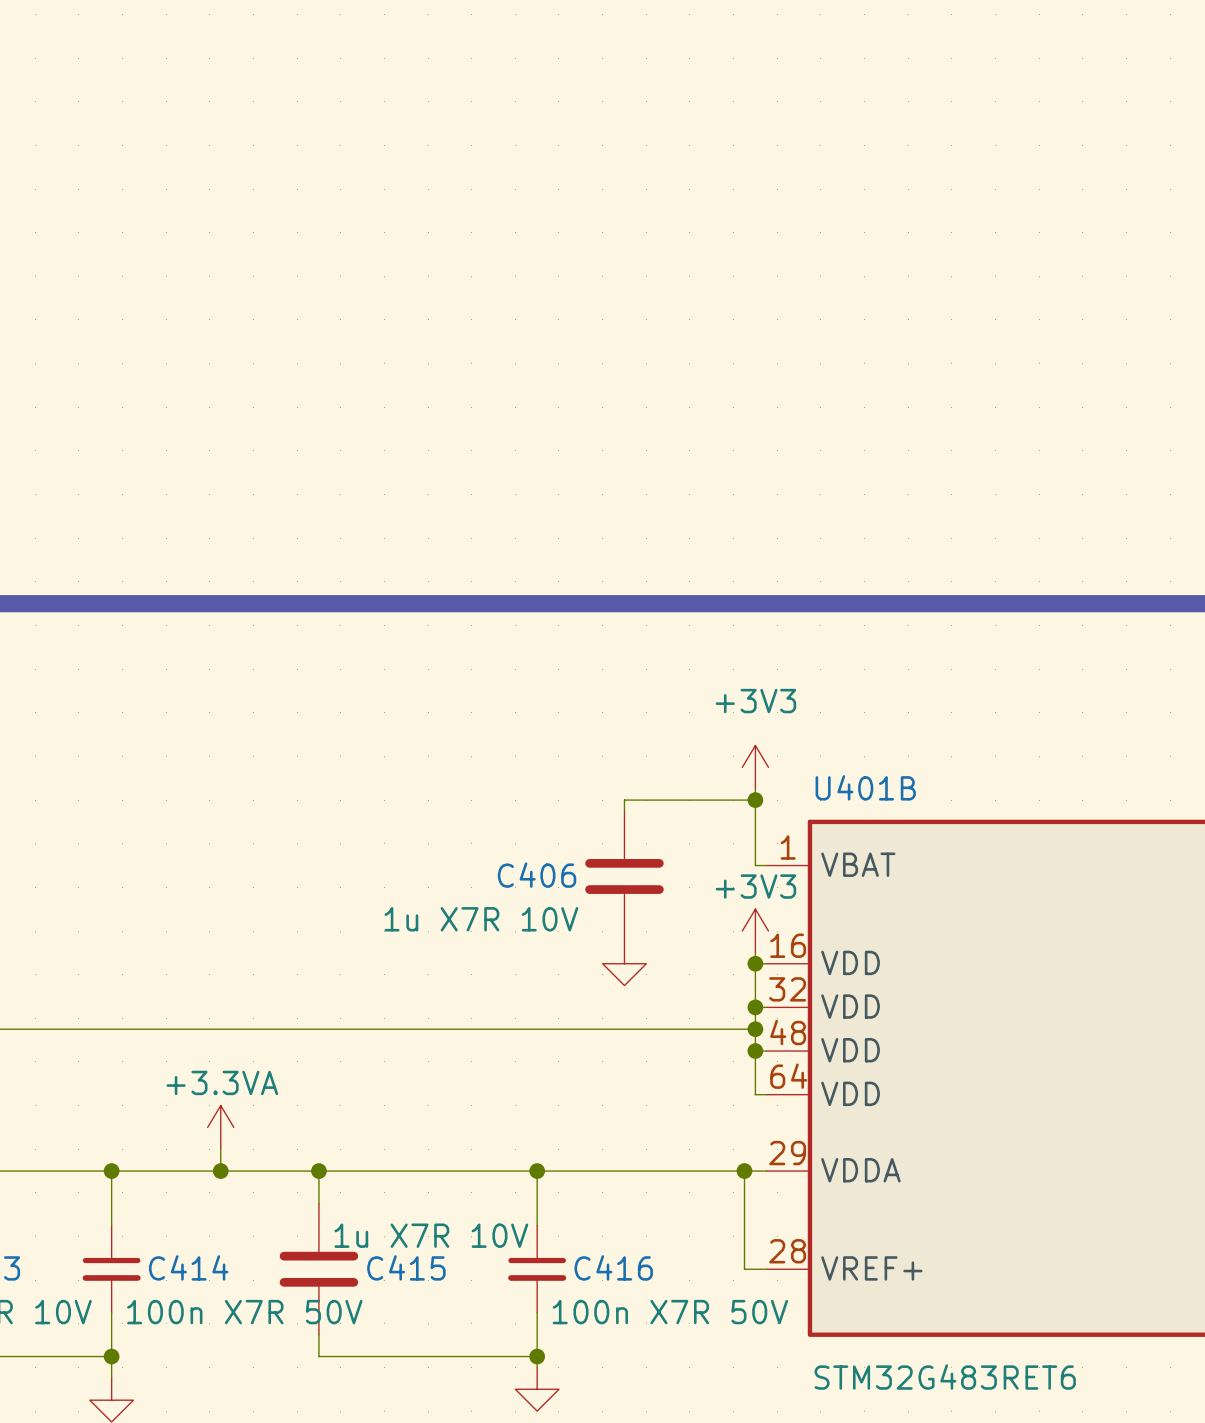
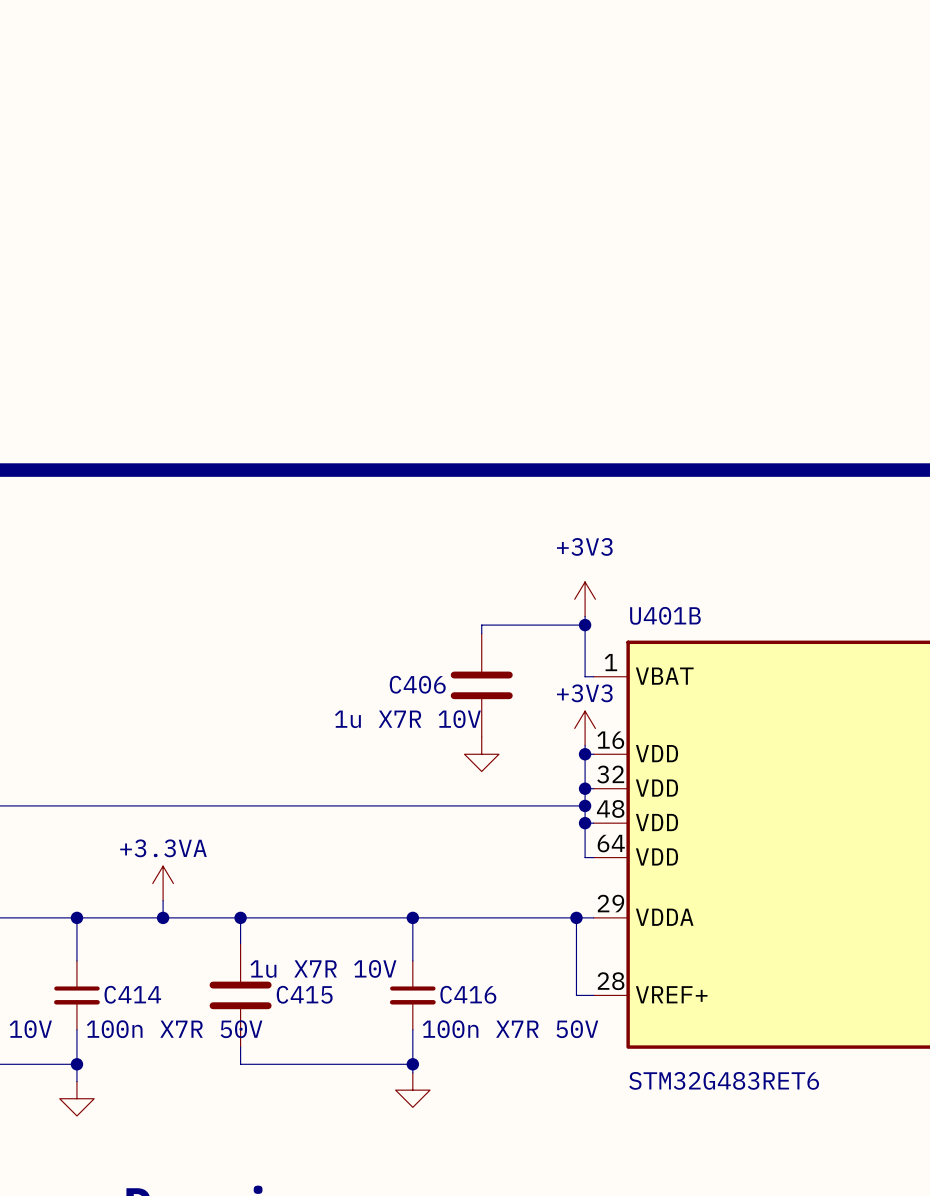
C406 value position: 1u X7R 10V (481, 919) -> 1u X7R 10V (407, 719)

